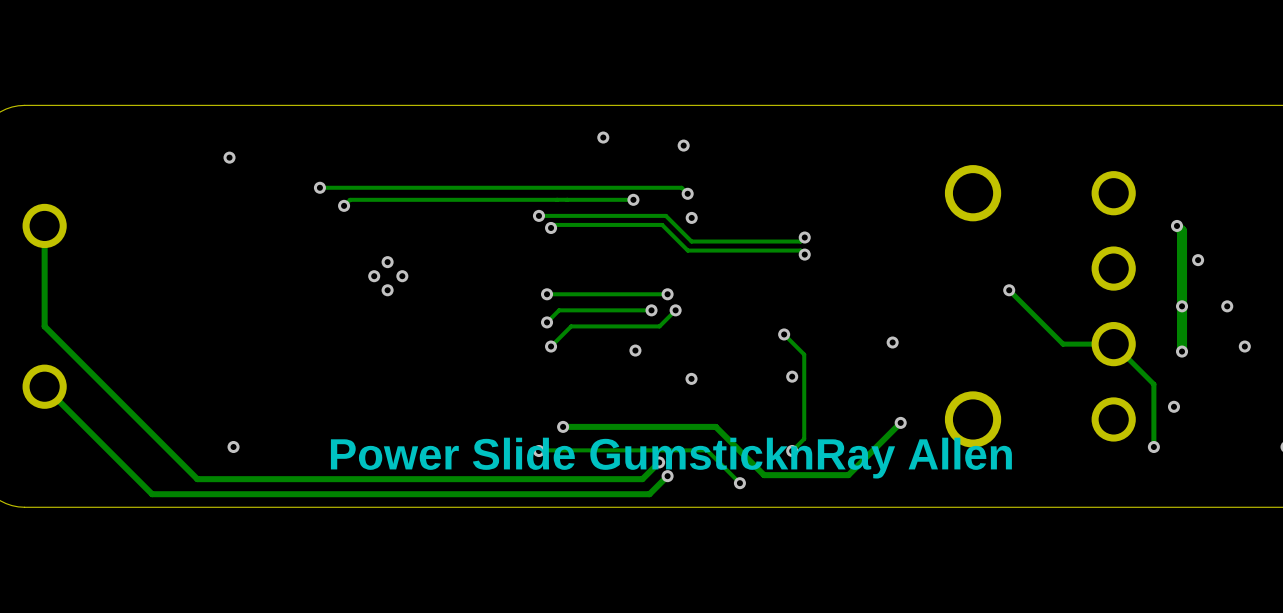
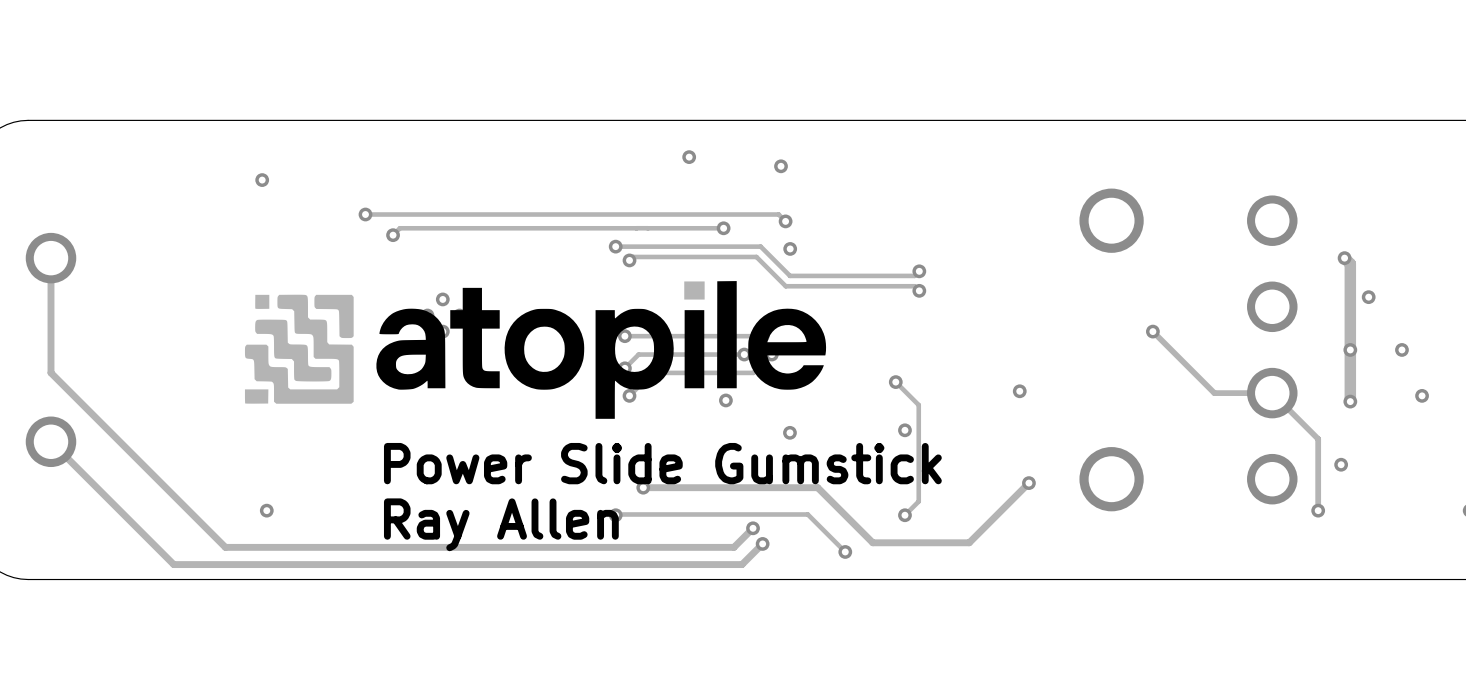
drawing: none -> [244, 281, 827, 419]
text: none -> Power Slide Gumstick (662, 463)
text: Power Slide GumsticknRay Allen (671, 458) -> Ray Allen (501, 524)

